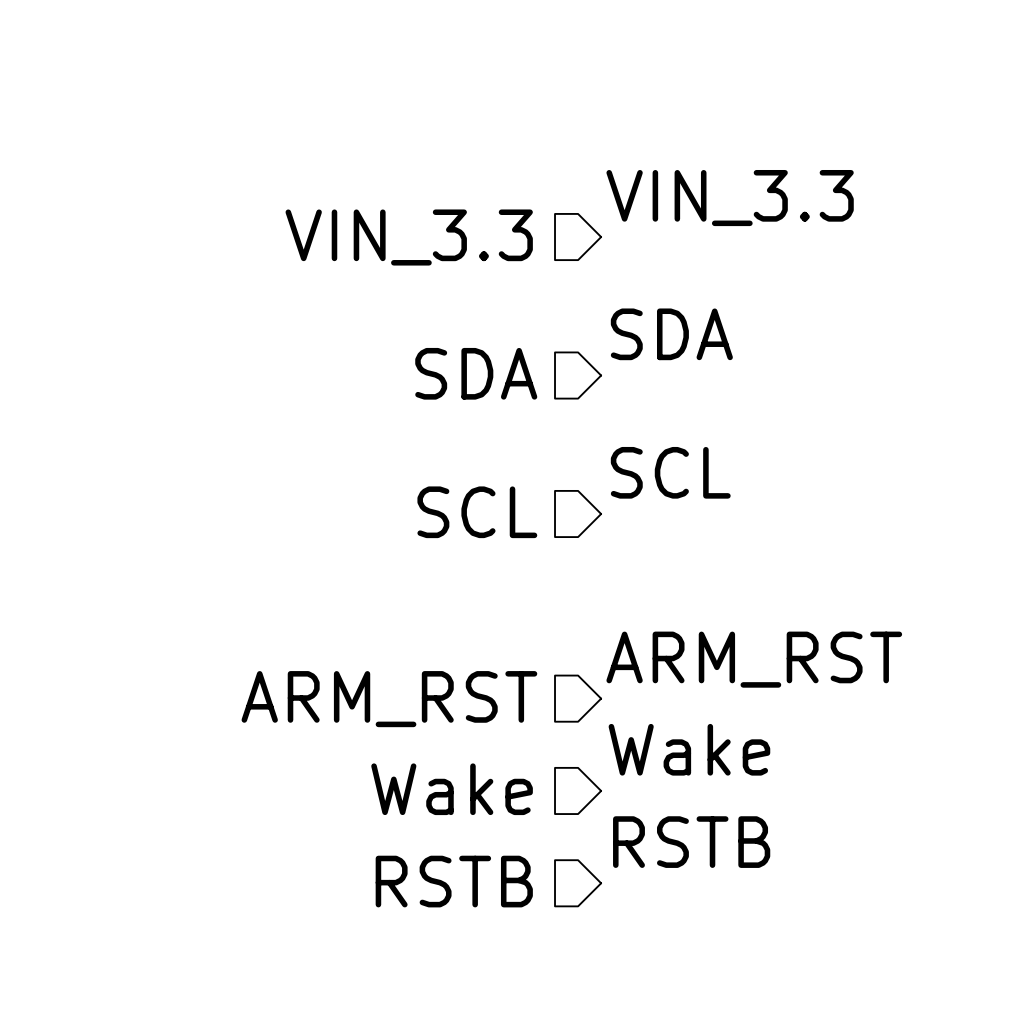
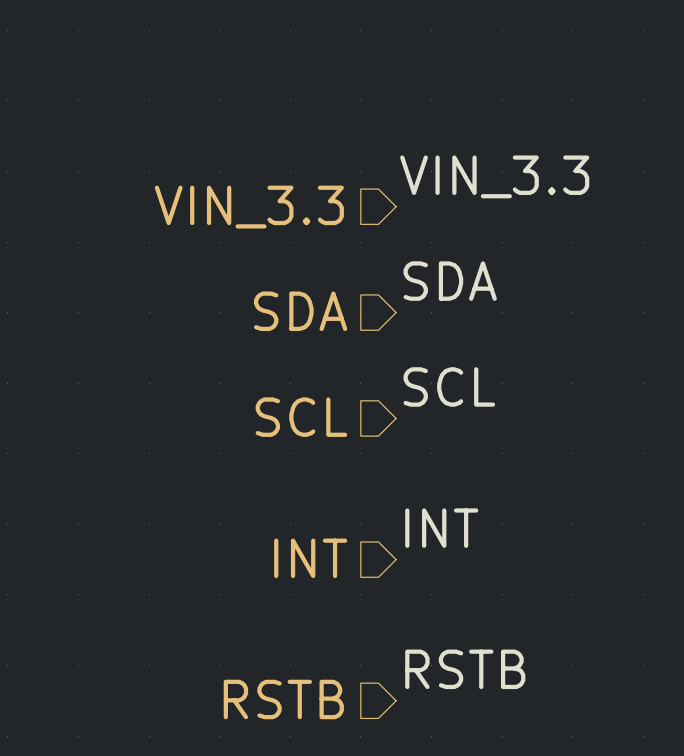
label: ARM_RST (754, 659) -> INT (441, 528)
hierarchical label: ARM_RST (389, 699) -> INT (310, 558)
label: Wake (689, 749) -> none
hierarchical label: Wake (452, 789) -> none

